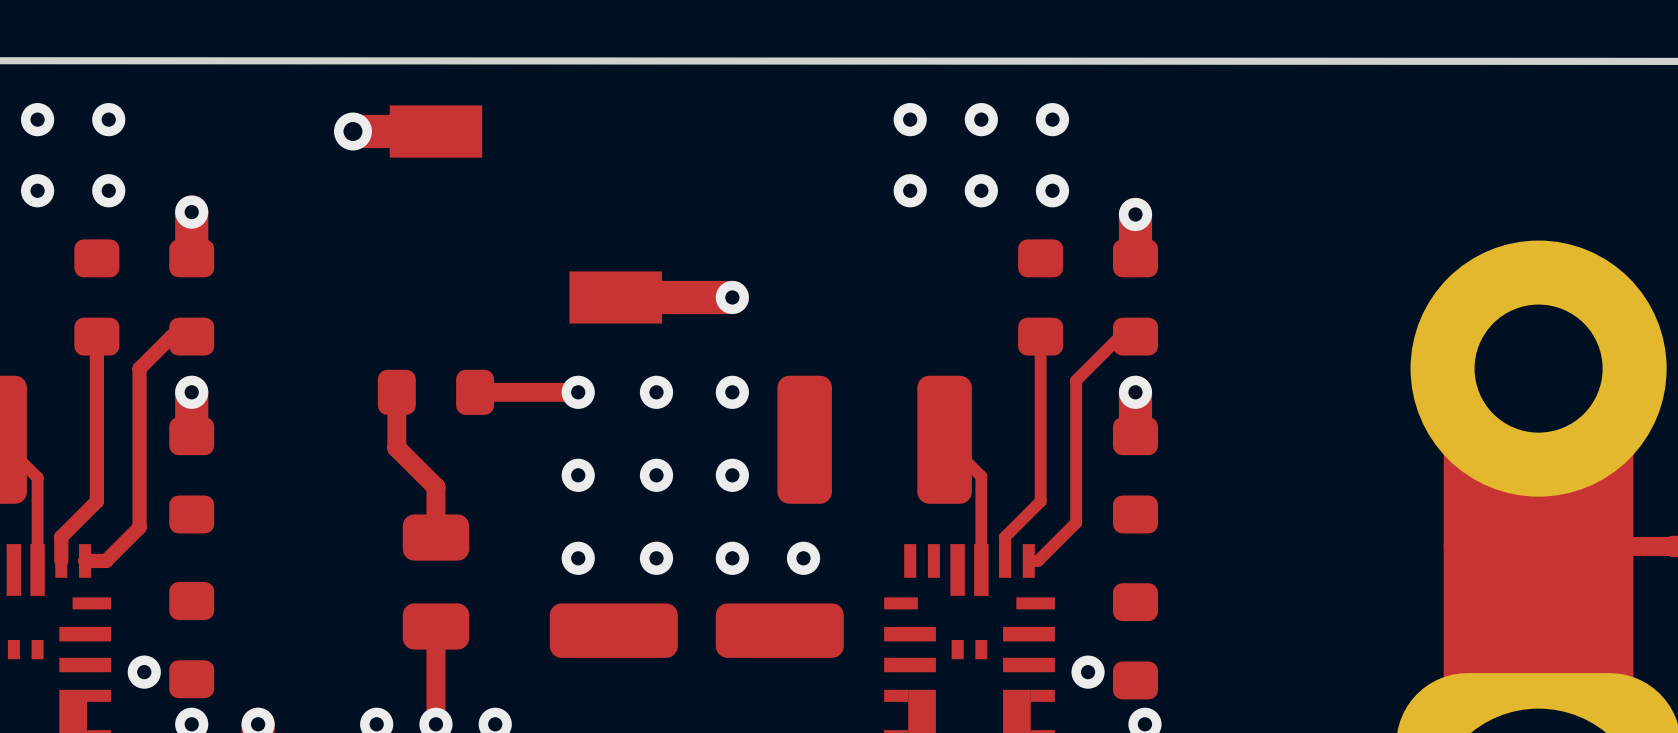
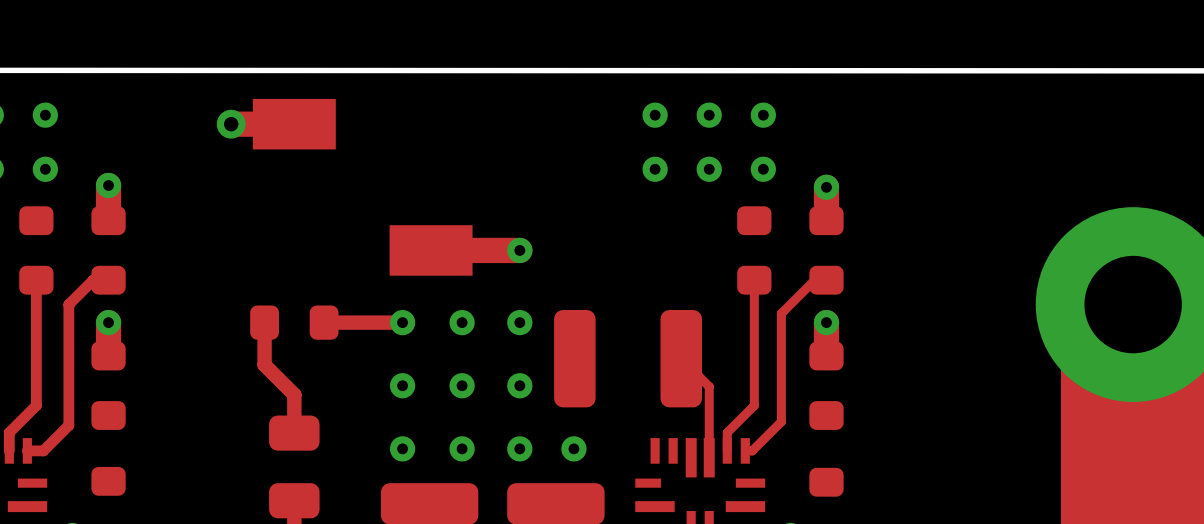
part footprint: [389, 105, 483, 158] -> [252, 98, 336, 150]
part footprint: [569, 271, 662, 324] -> [389, 225, 473, 276]

